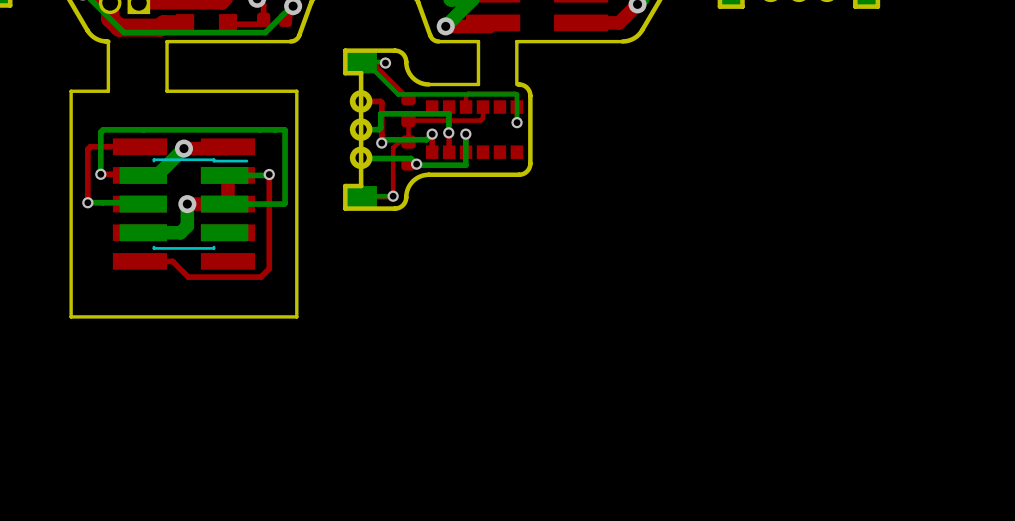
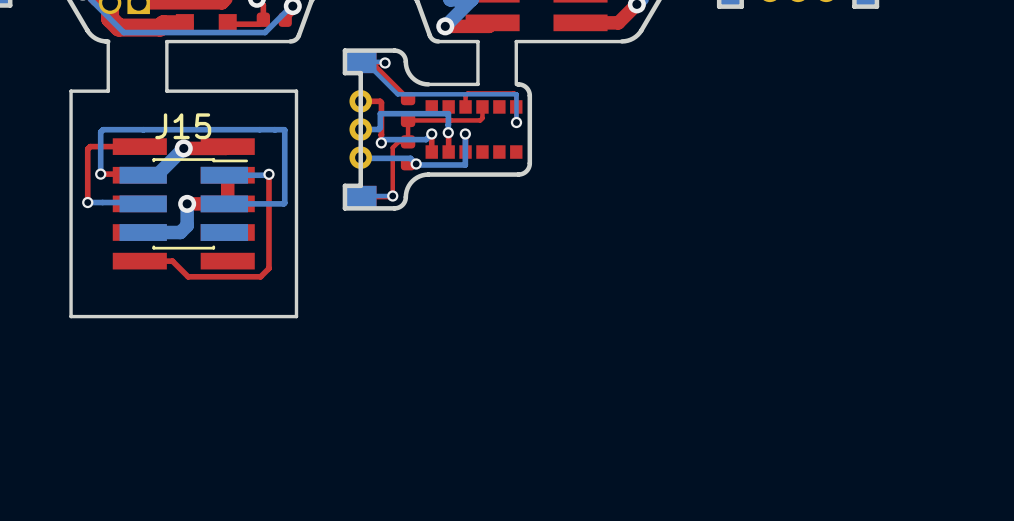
J15 name: none -> J15 (183, 126)

